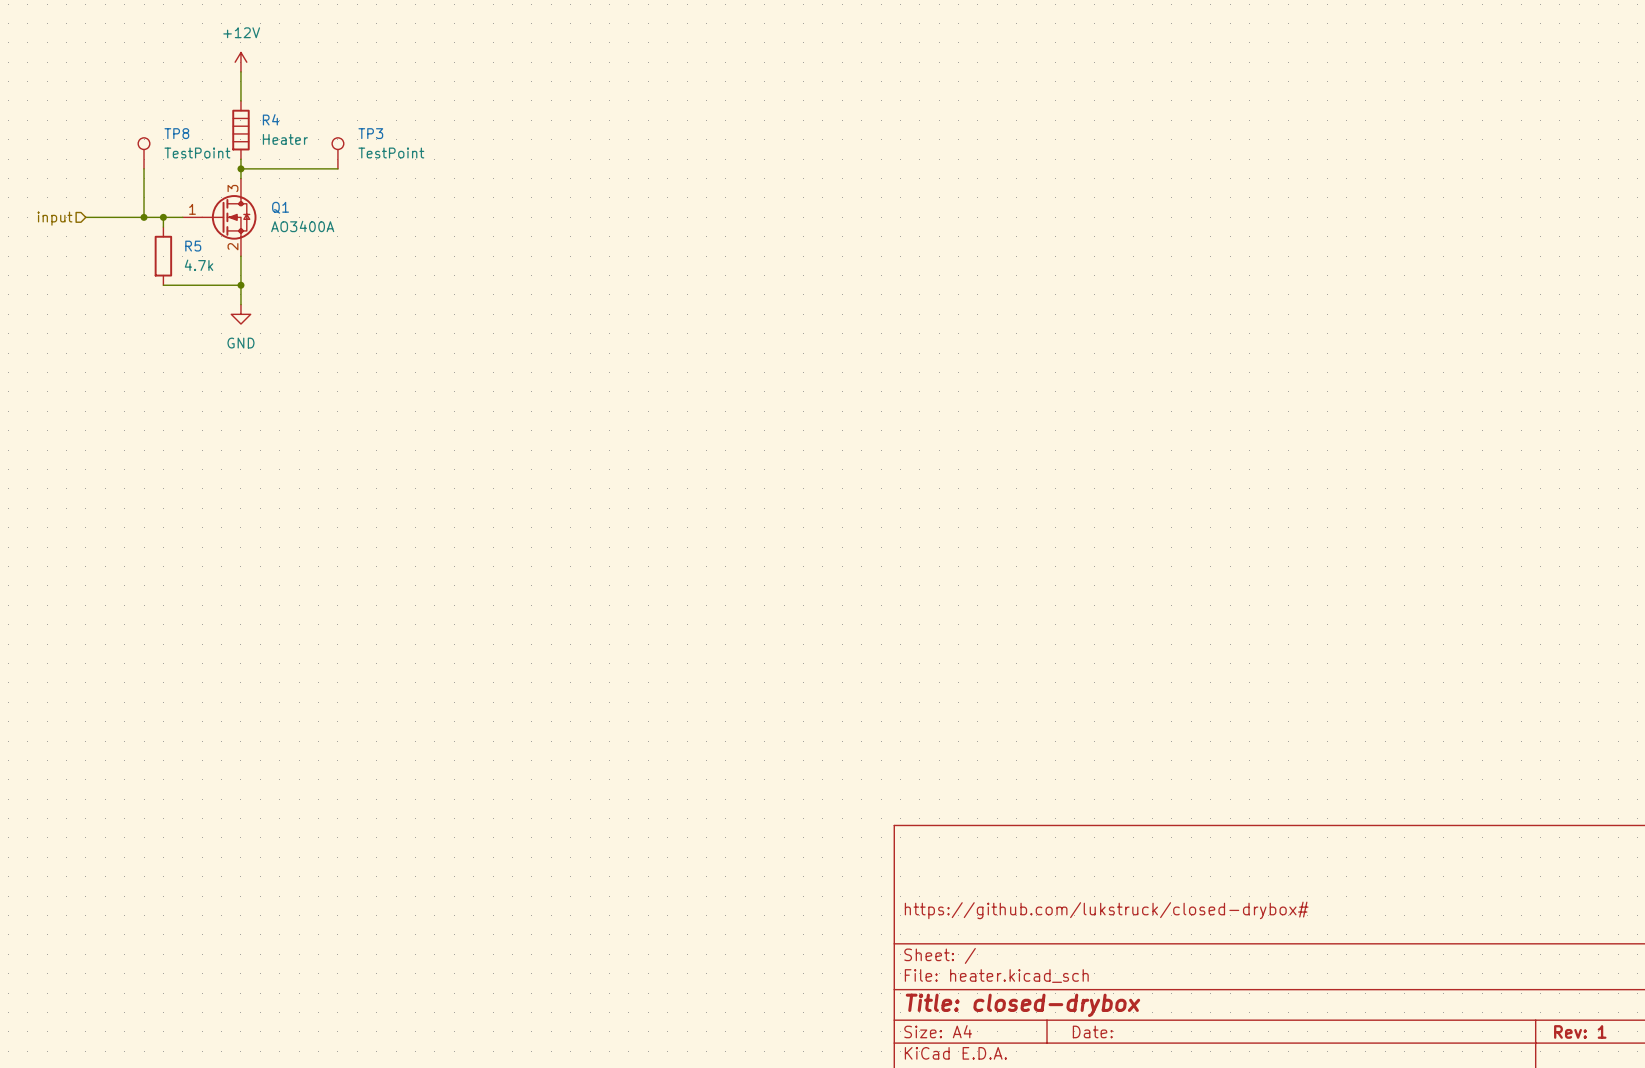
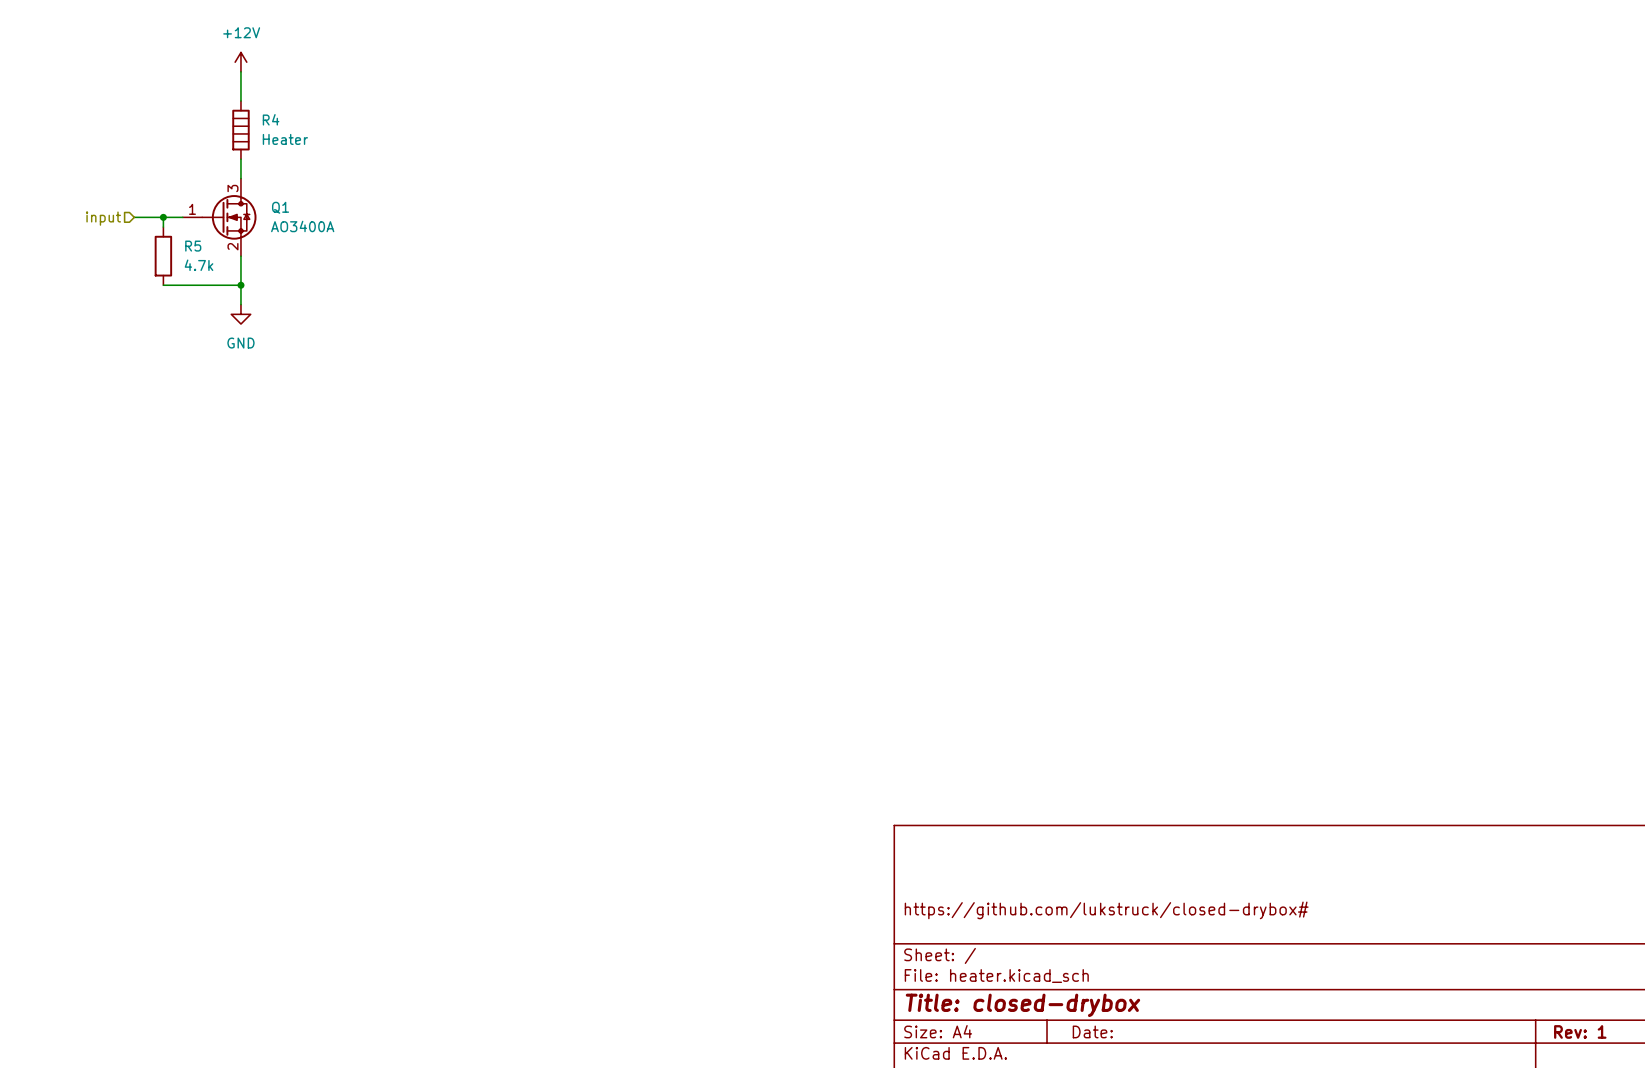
TP8: TestPoint (144, 153) -> none
TP3: TestPoint (337, 153) -> none
wire: (144, 168) (144, 217) -> none
wire: (240, 168) (337, 168) -> none
junction: (240, 168) -> none
wire: (85, 217) (134, 217) -> none
junction: (144, 217) -> none
hierarchical label position: input (54, 218) -> input (103, 218)

